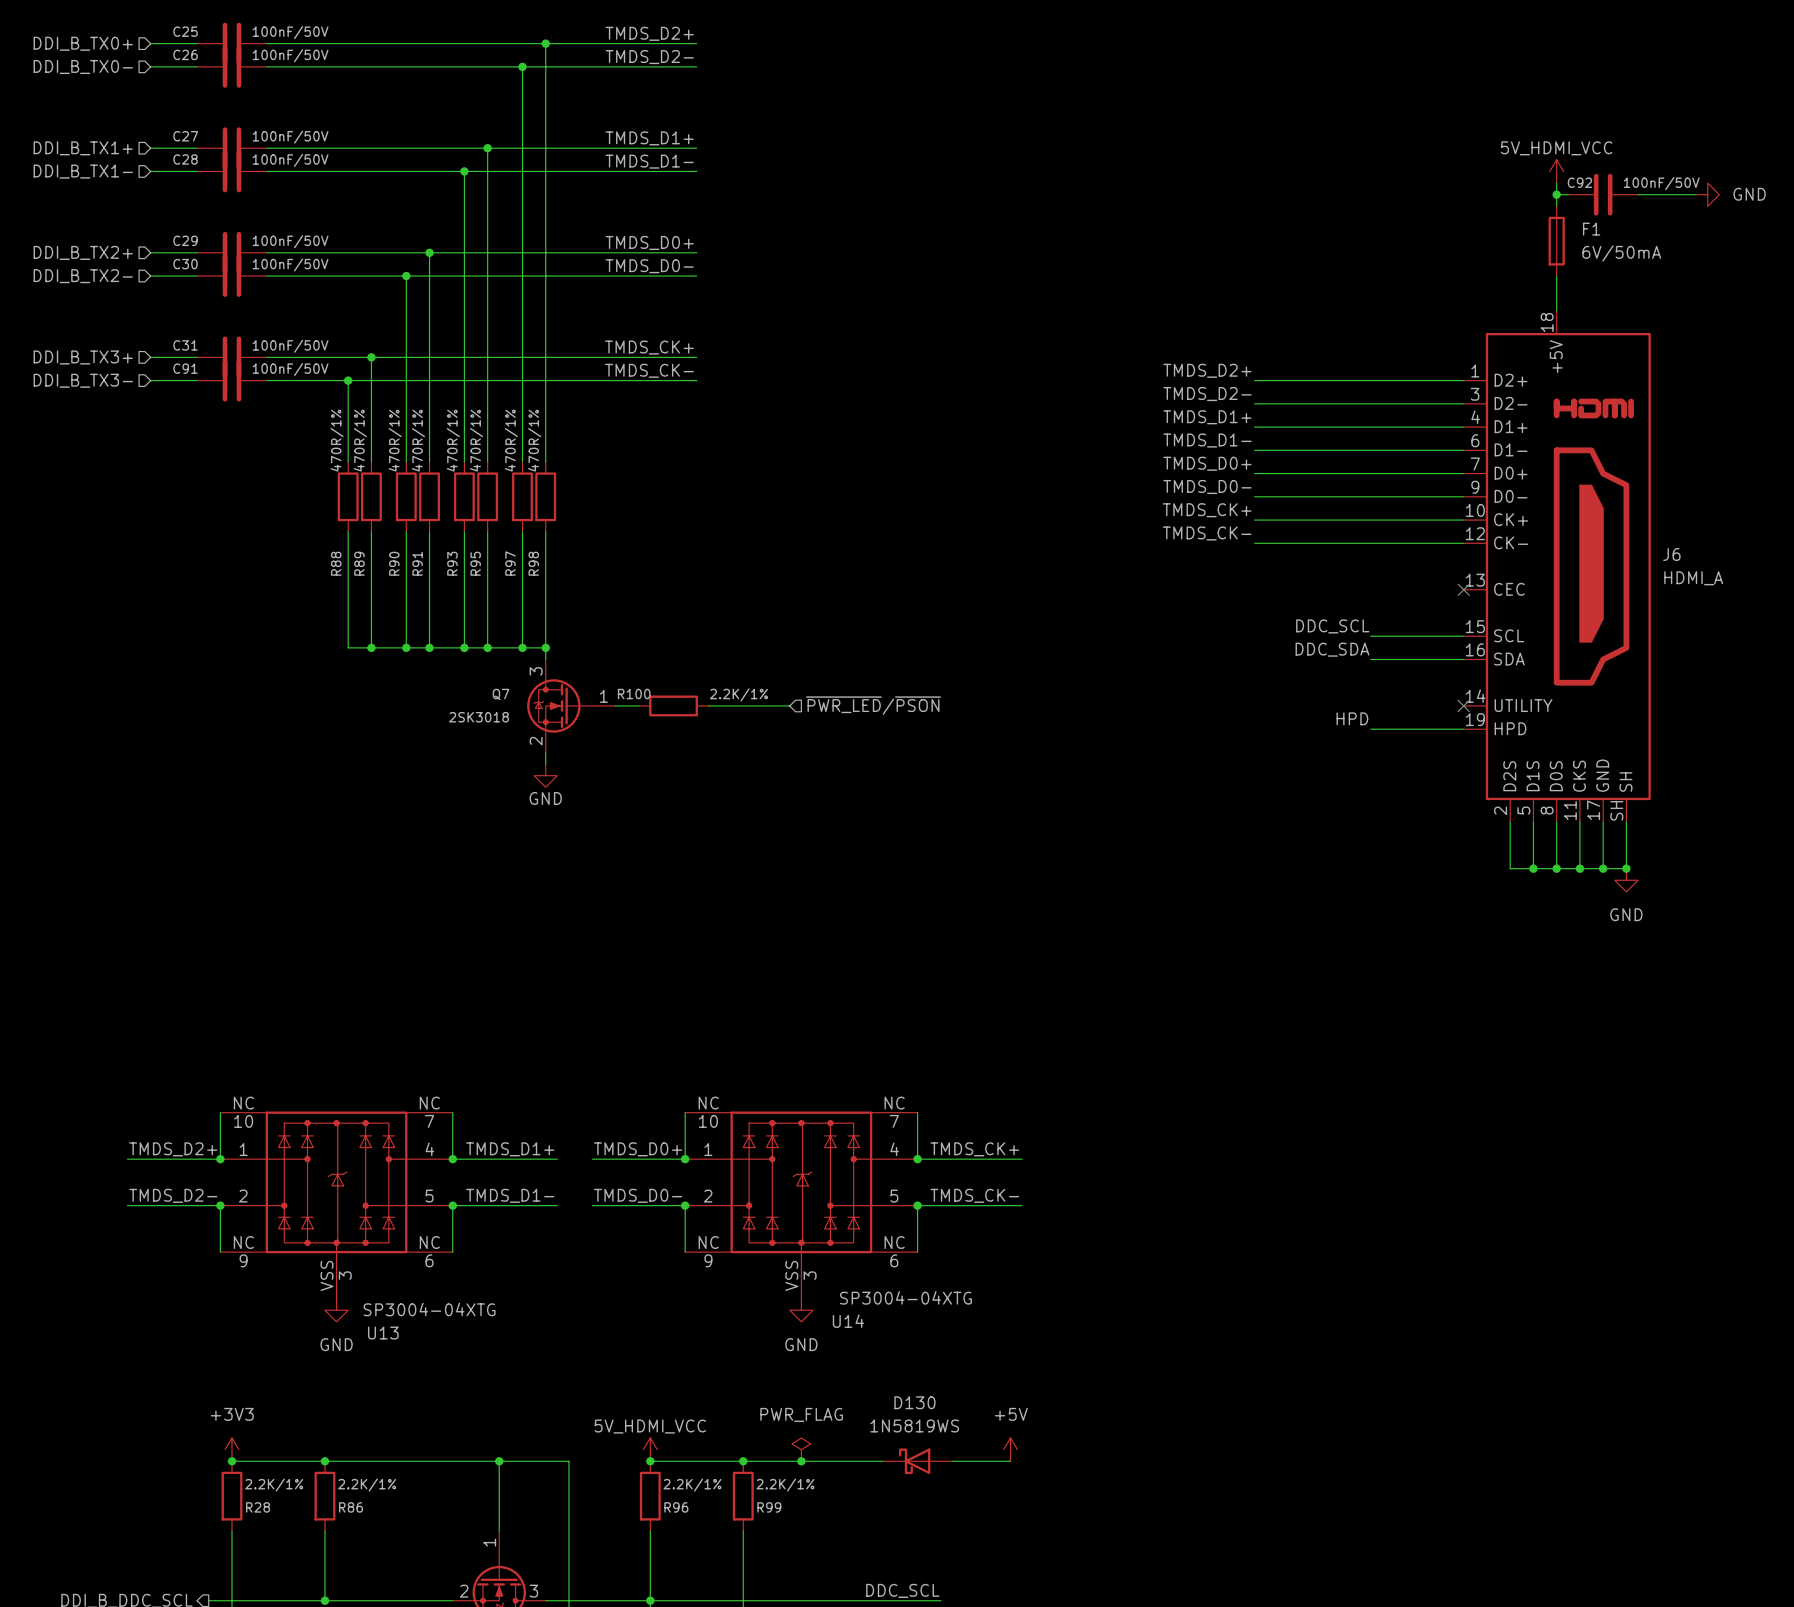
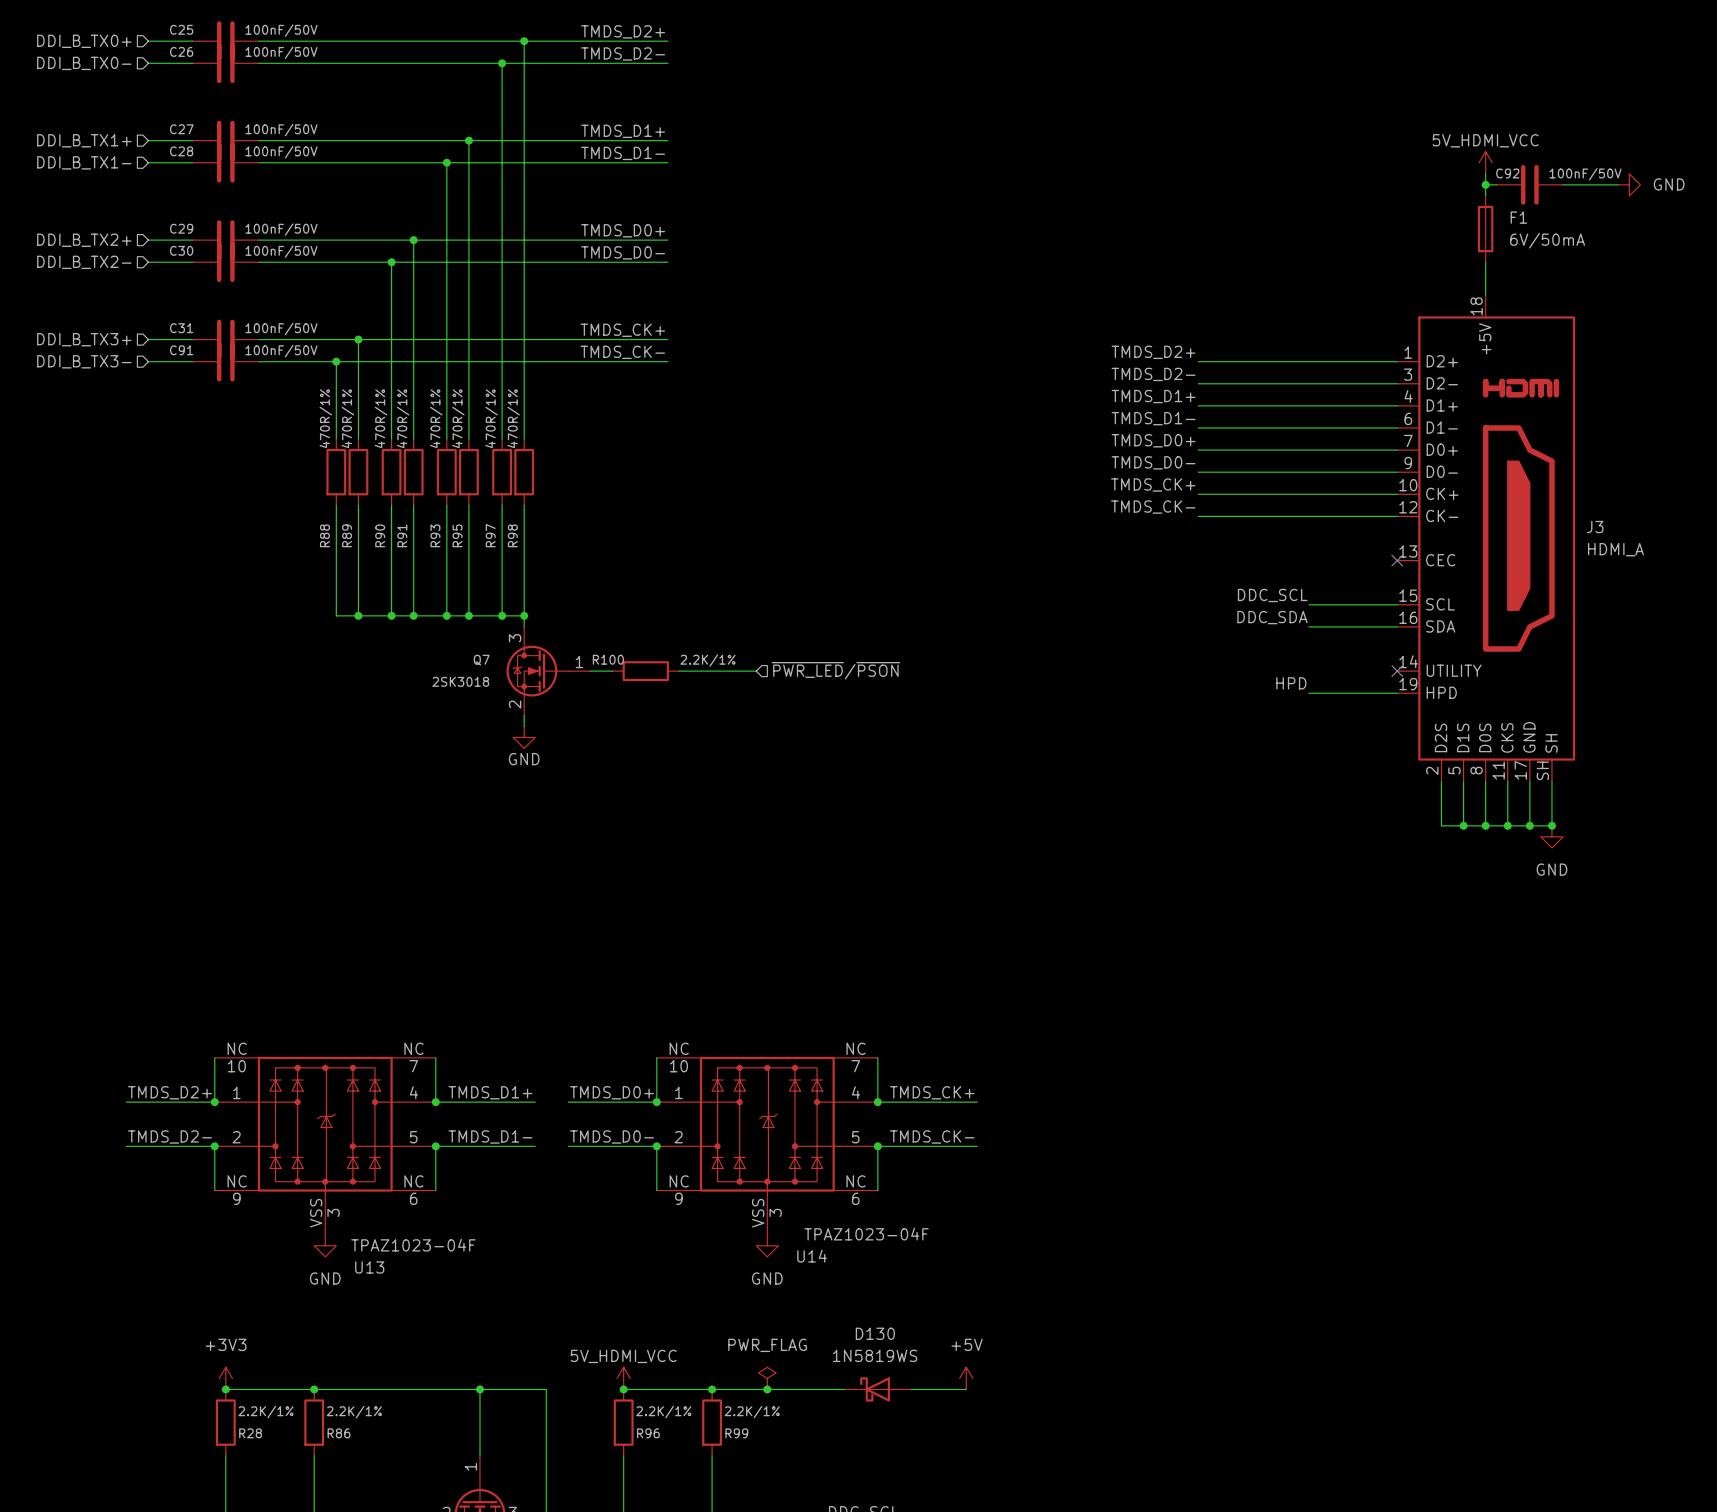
J6 name: J6 (1671, 554) -> J3 (1595, 527)
U14 value: SP3004-04XTG (905, 1297) -> TPAZ1023-04F (866, 1234)
U13 value: SP3004-04XTG (429, 1309) -> TPAZ1023-04F (413, 1245)

